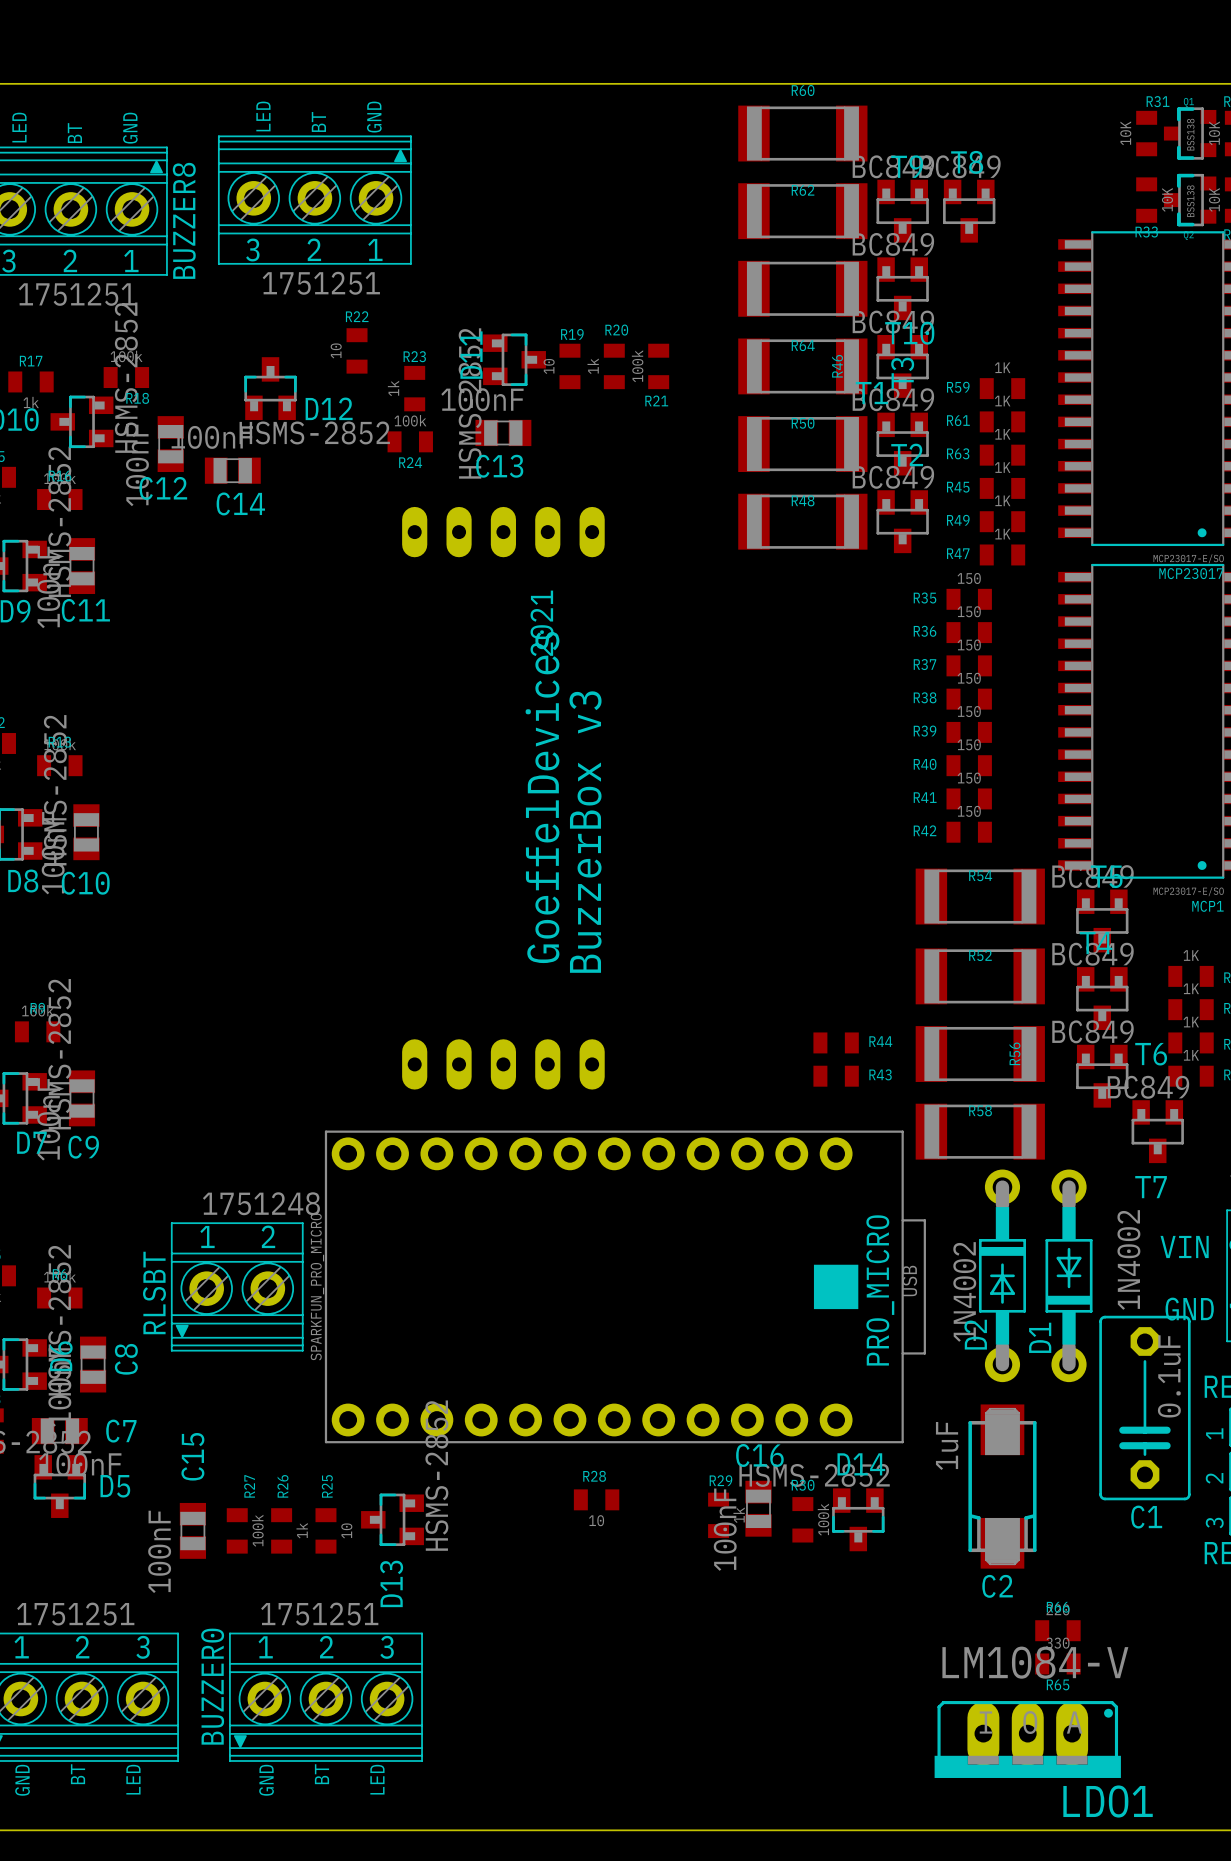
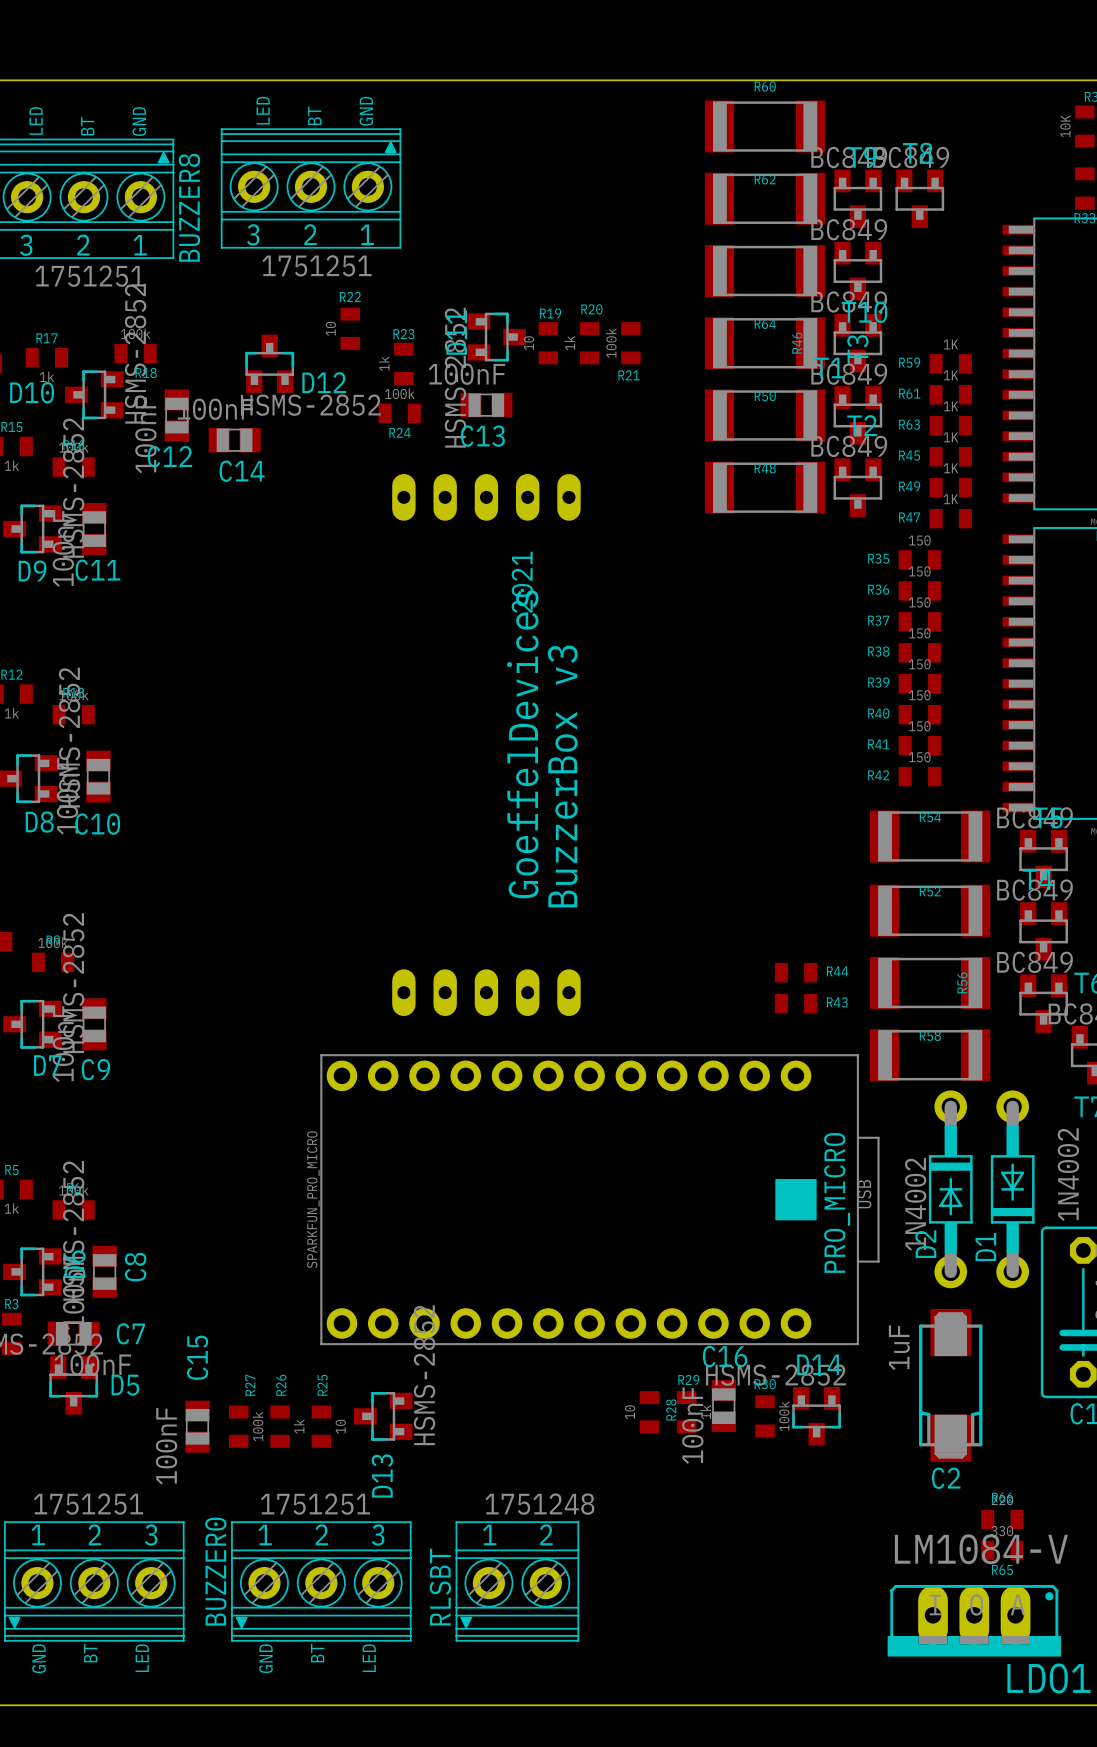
RLSBT: 1751248 (237, 1286) -> none
R28 rotation: 0° (596, 1499) -> 90° clockwise (649, 1412)
R28 position: (596, 1499) -> (649, 1412)
RLSBT: none -> 1751248 (517, 1581)

